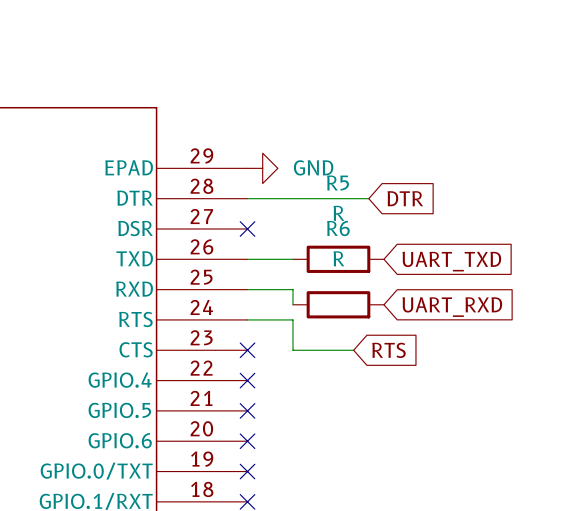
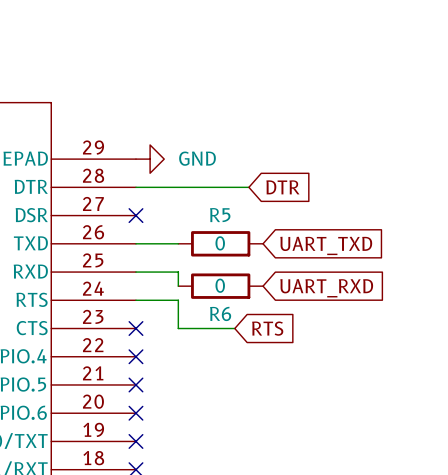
R5 name position: R5 (338, 182) -> R5 (220, 215)
R5 value: R (338, 213) -> 0 (220, 243)
R6 name position: R6 (338, 228) -> R6 (220, 313)
R6 value: R (338, 258) -> 0 (220, 285)

